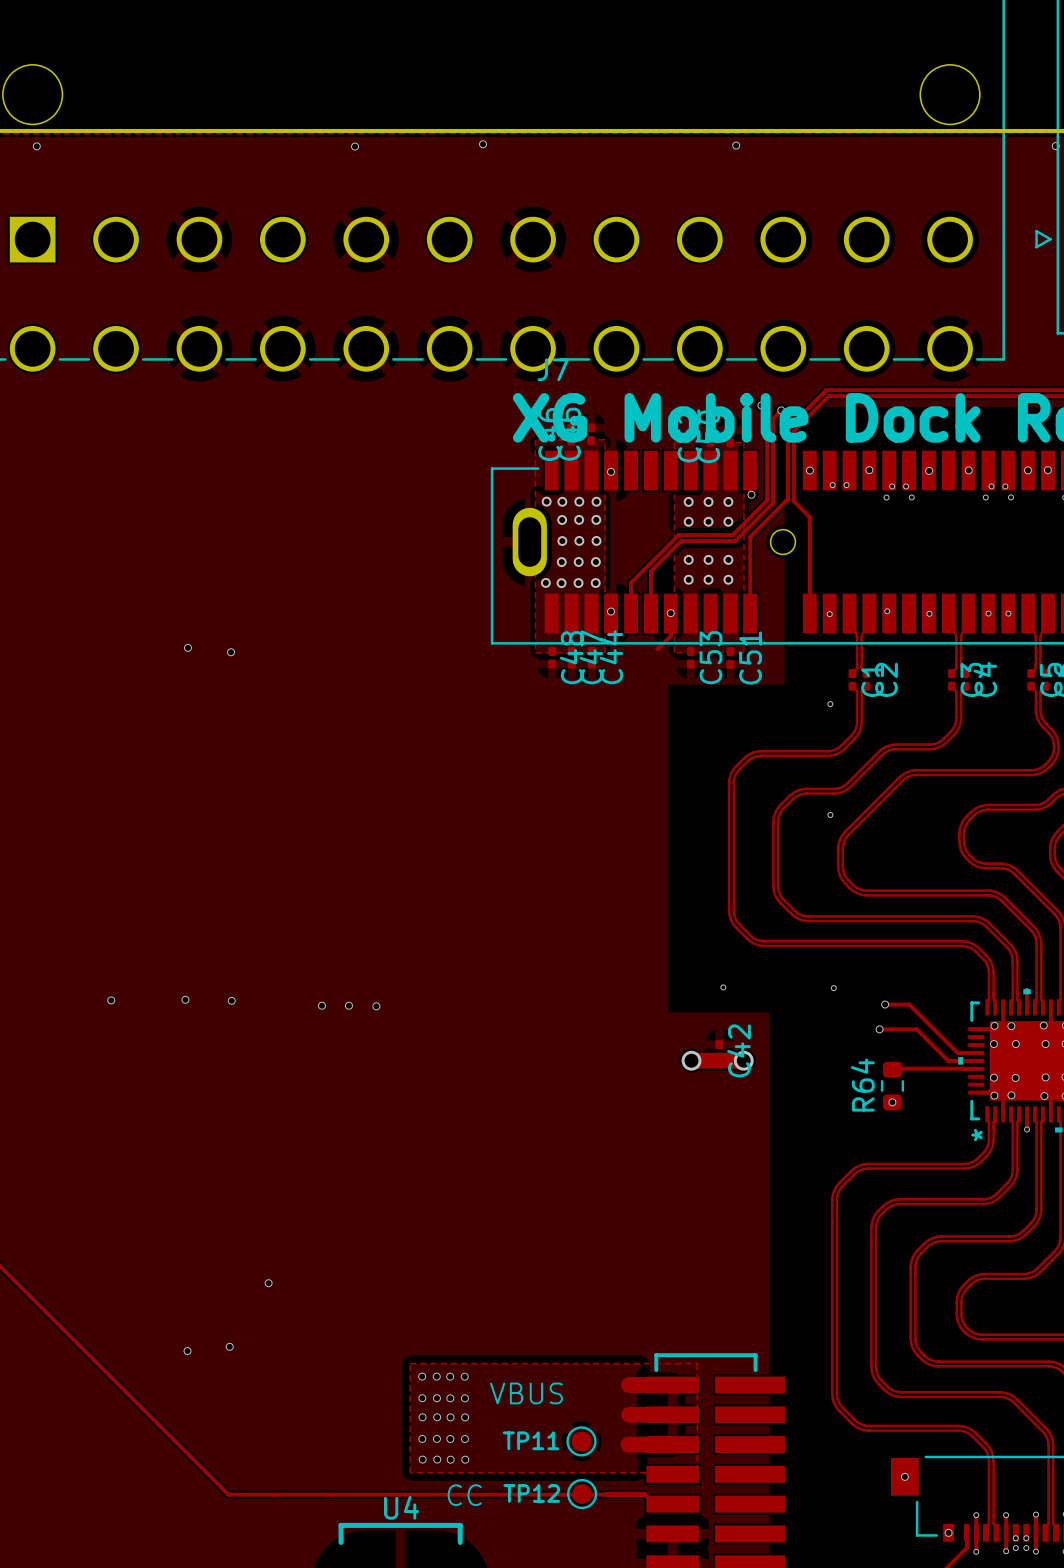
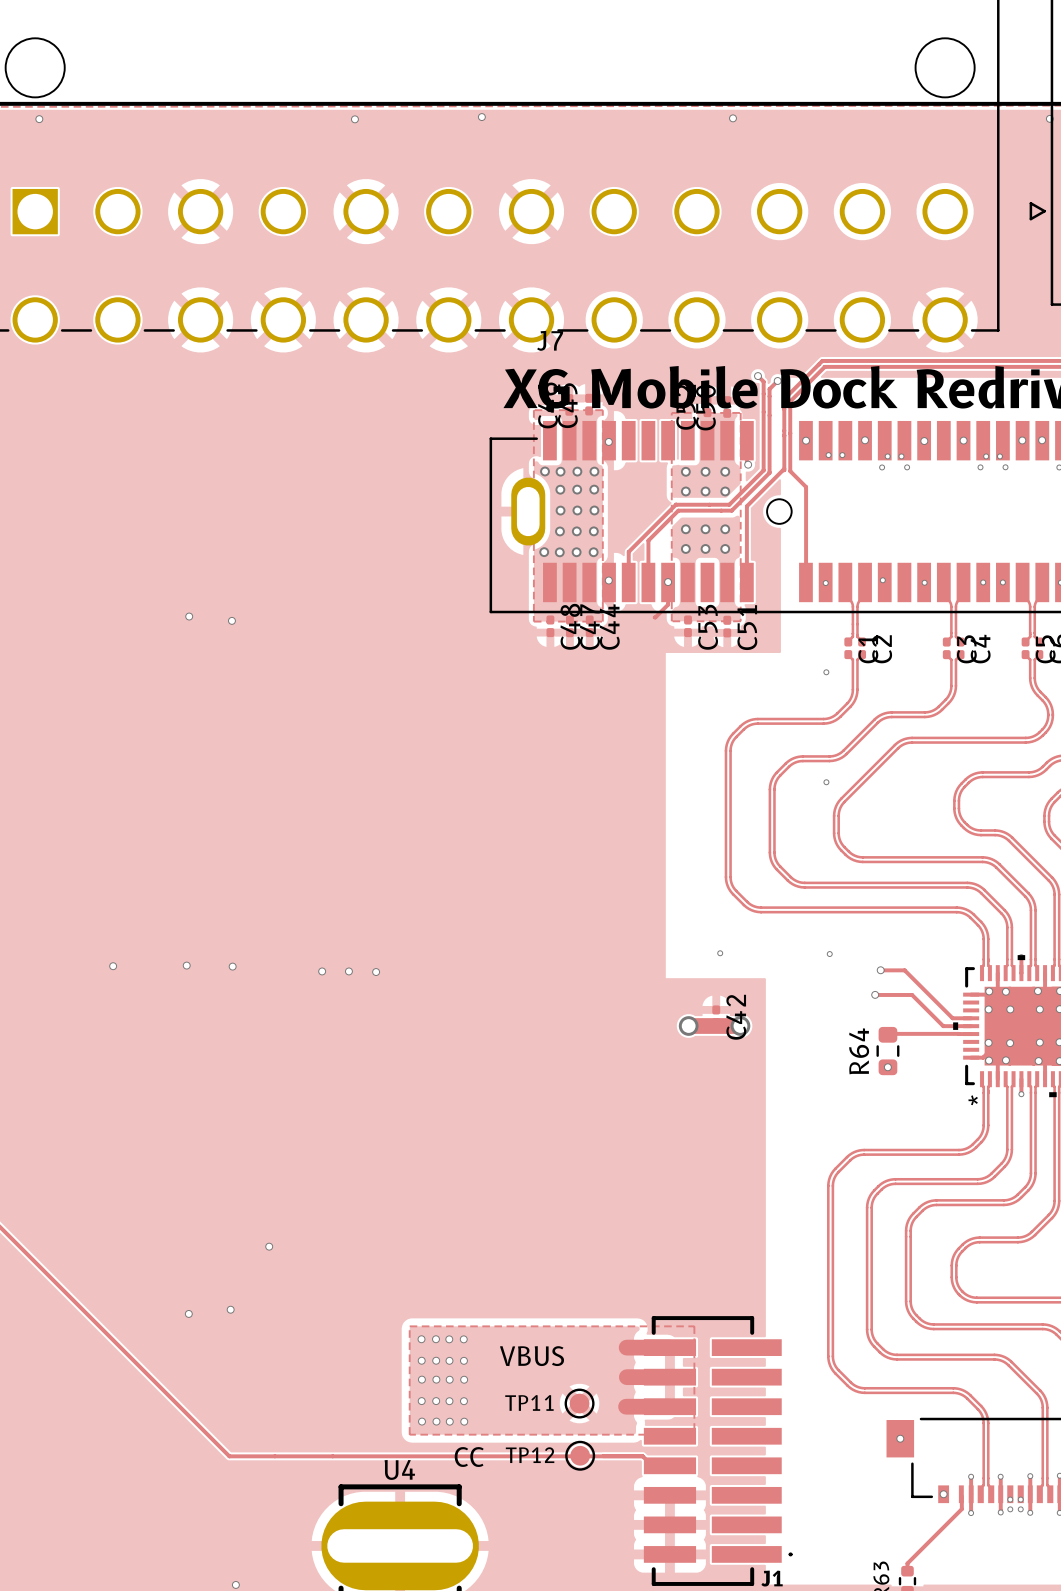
track: (988, 1139) (984, 1151) (975, 1160) (967, 1163) (868, 1163) (856, 1166) (839, 1182) (834, 1190) (832, 1221) -> (983, 1103) (982, 1131) (979, 1137) (968, 1147) (958, 1150) (857, 1151) (848, 1155) (833, 1171) (828, 1185)
track: (993, 1139) (988, 1154) (978, 1163) (970, 1167) (868, 1168) (859, 1170) (838, 1192) (836, 1221) -> (988, 1103) (986, 1134) (971, 1151) (958, 1154) (860, 1154) (851, 1159) (837, 1173) (832, 1185)
track: (1012, 1169) (1008, 1182) (995, 1194) (988, 1198) (900, 1199) (888, 1202) (878, 1210) (873, 1218) (871, 1243) -> (1007, 1133) (1007, 1151) (1004, 1158) (986, 1176) (977, 1179) (888, 1180) (880, 1184) (872, 1192) (867, 1207)
track: (1017, 1169) (1012, 1184) (997, 1198) (989, 1203) (900, 1203) (890, 1206) (877, 1220) (876, 1243) -> (1011, 1133) (1010, 1158) (1004, 1166) (989, 1180) (977, 1183) (891, 1184) (884, 1187) (876, 1195) (871, 1207)

